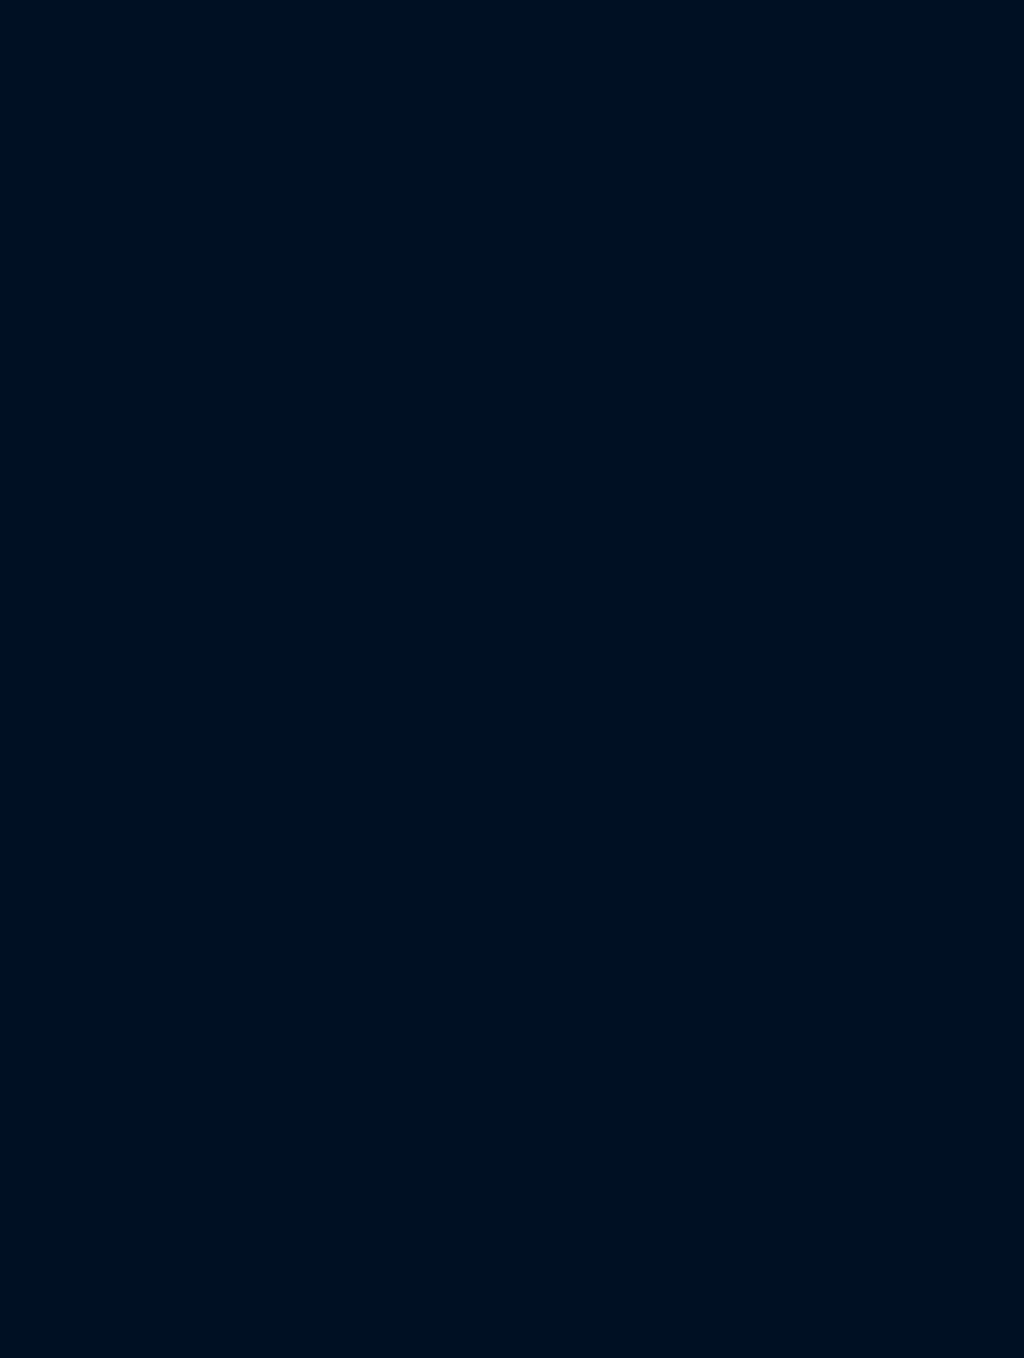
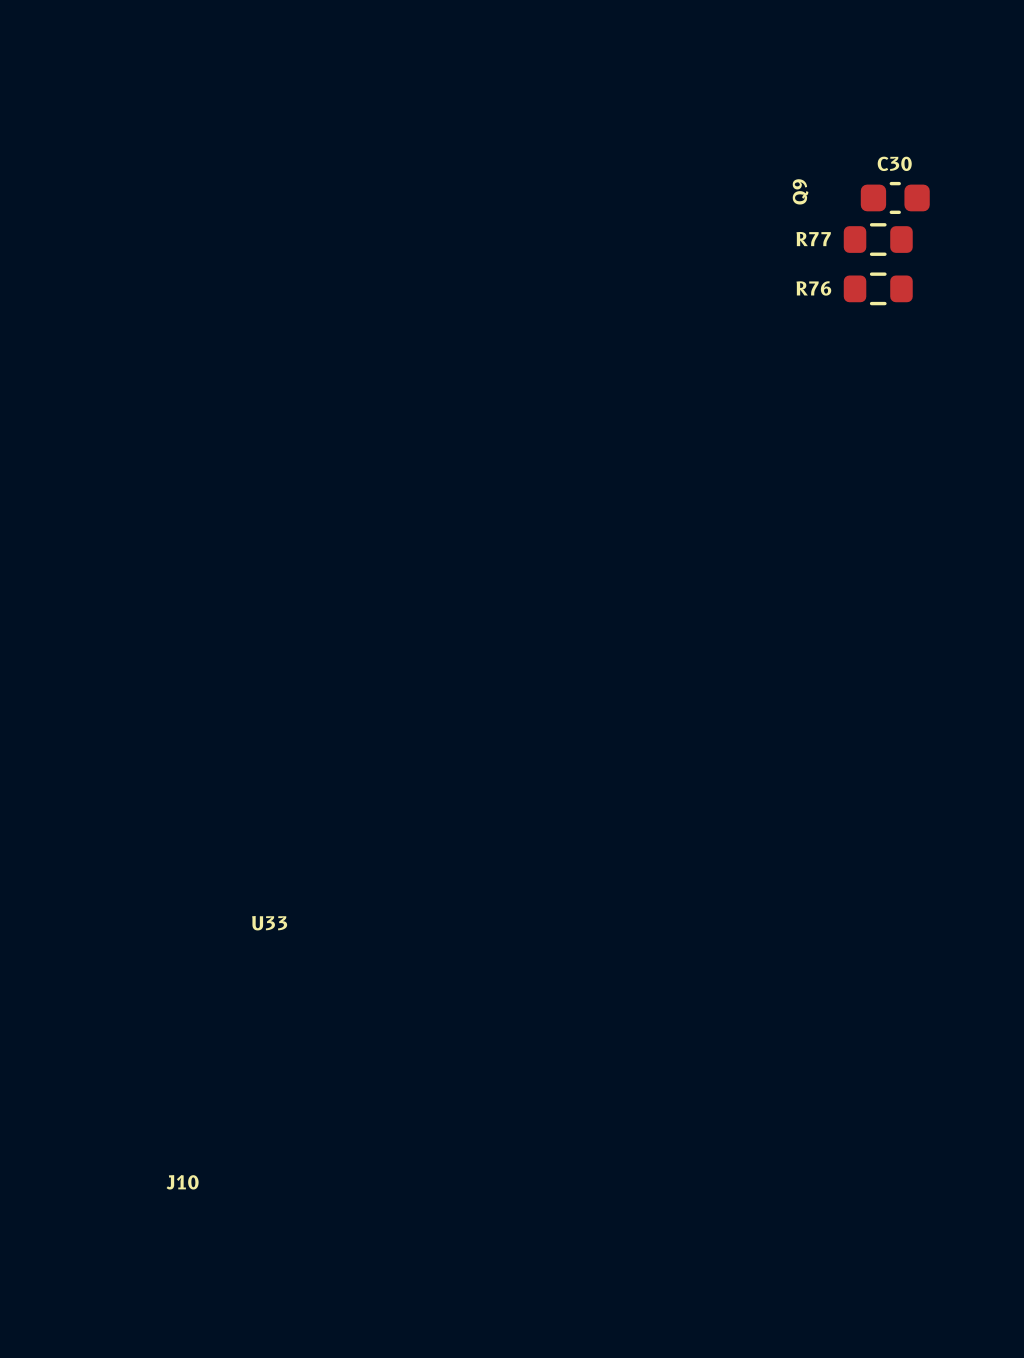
Q9: none -> (800, 191)
C30: none -> (895, 197)
R77: none -> (878, 239)
R76: none -> (878, 288)
U33: none -> (269, 923)
J10: none -> (182, 1182)

